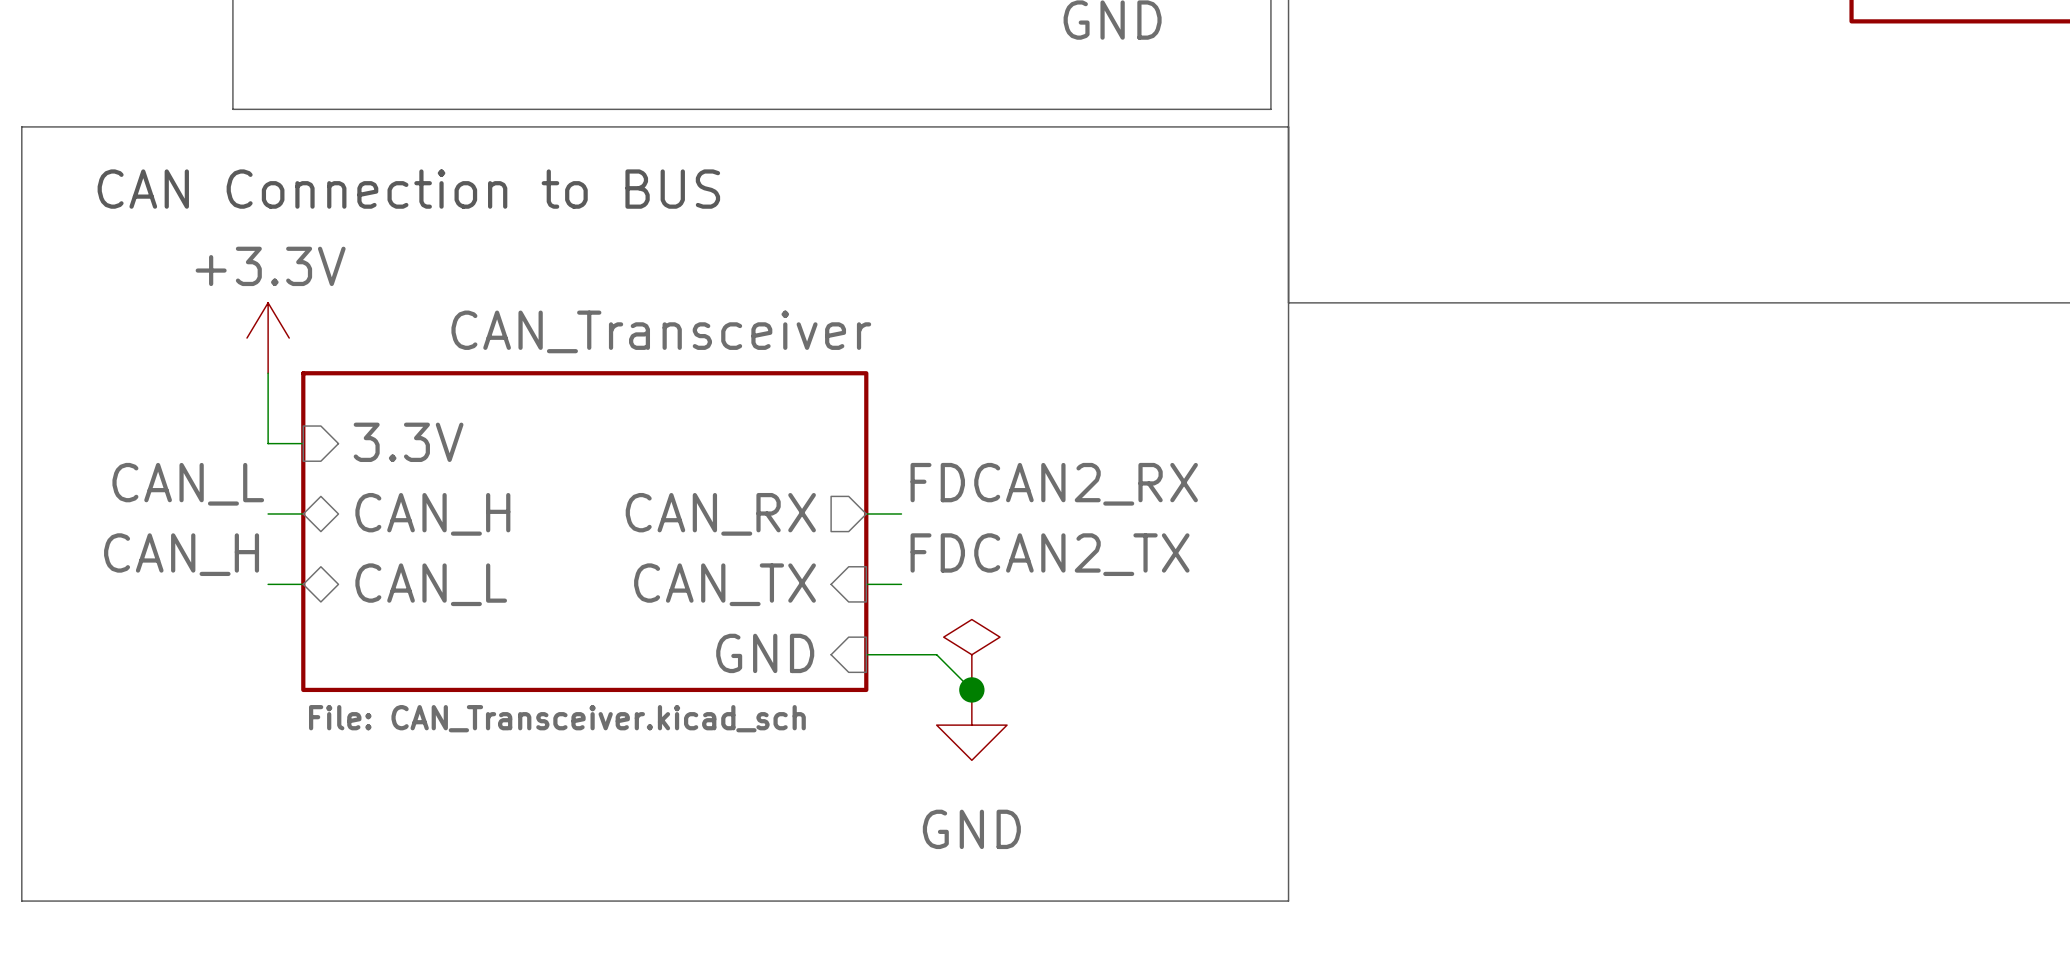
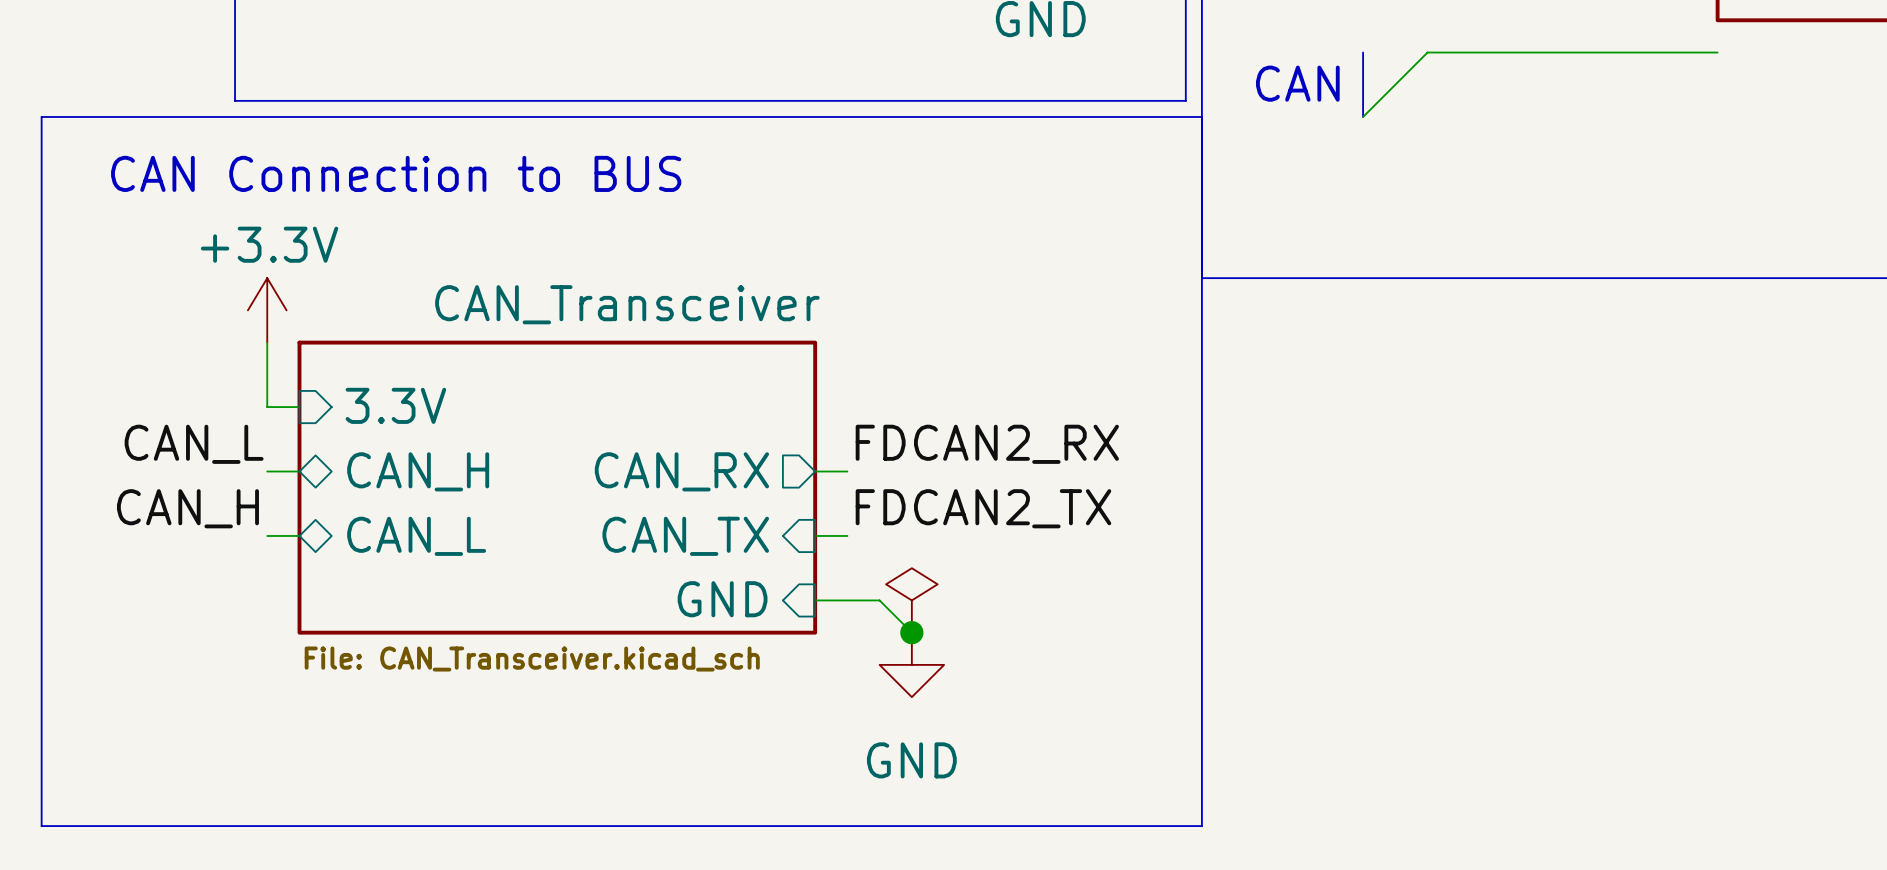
bus: none -> (1363, 52) (1363, 116)
wire: none -> (1717, 52) (1427, 52) (1363, 116)
text: none -> CAN (1297, 83)

